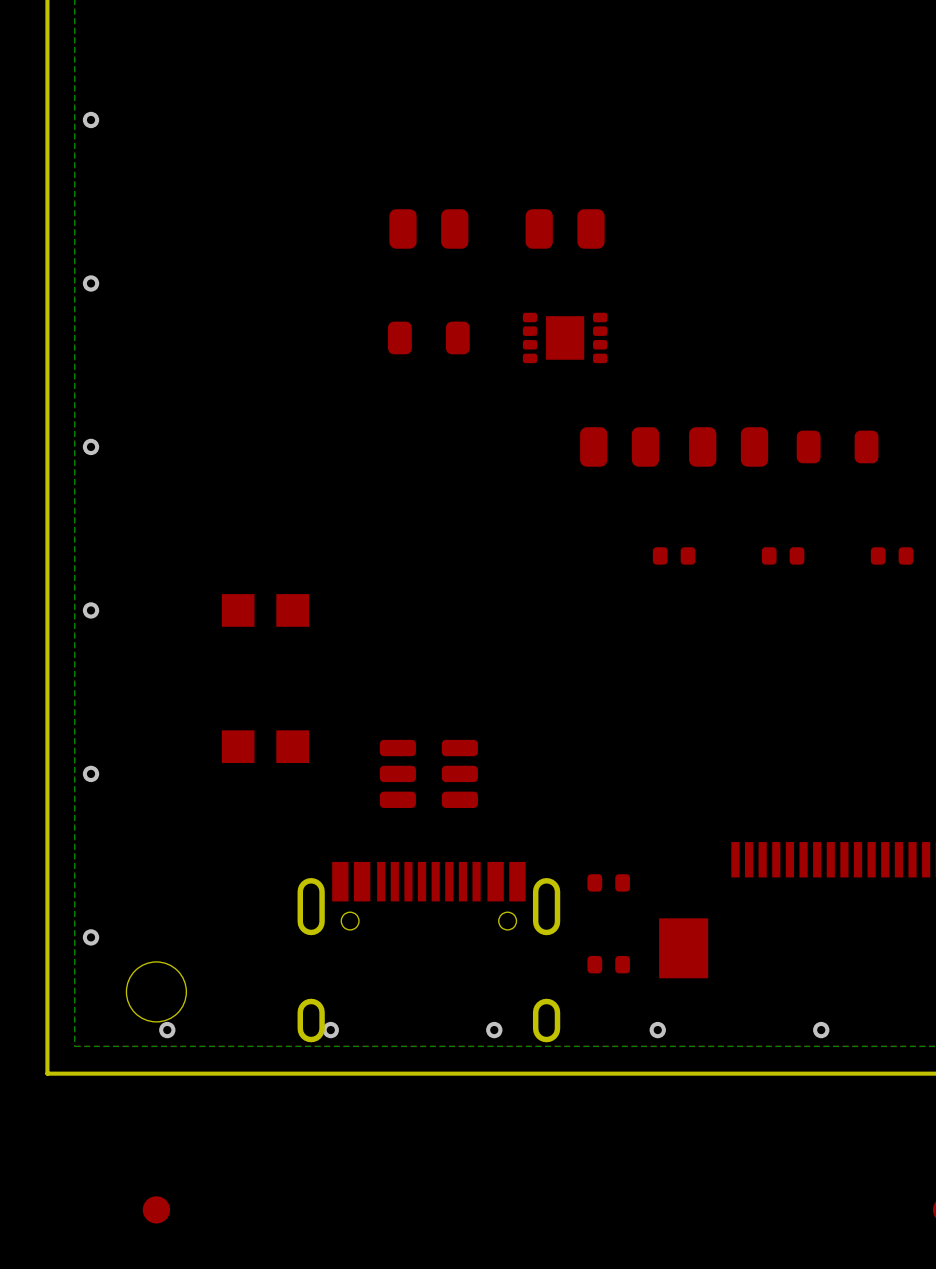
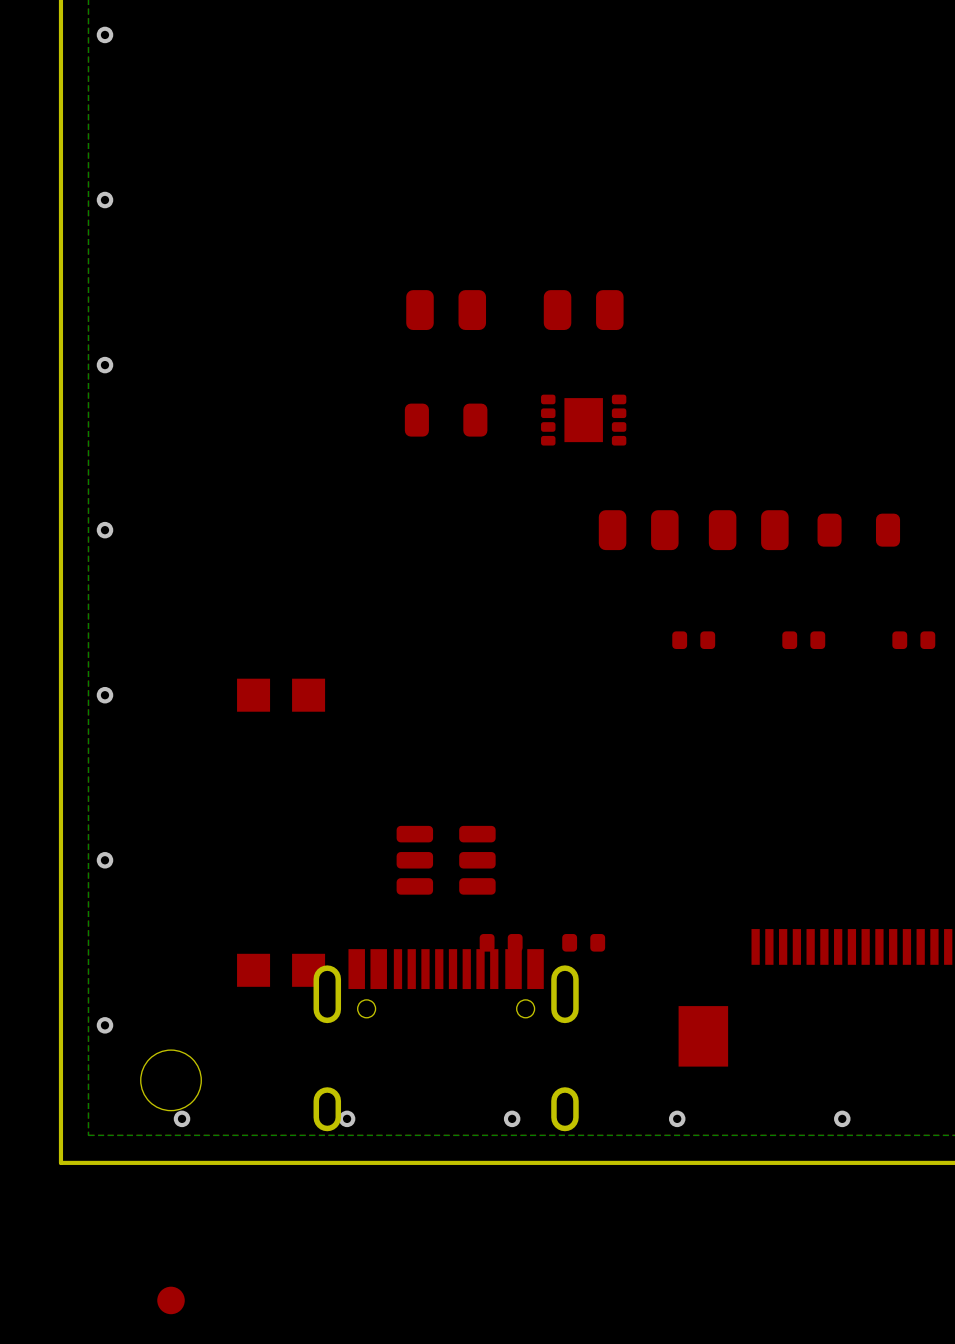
part position: (265, 746) -> (281, 970)
part: none -> (501, 942)
part position: (608, 882) -> (583, 942)
part: (608, 964) -> none

